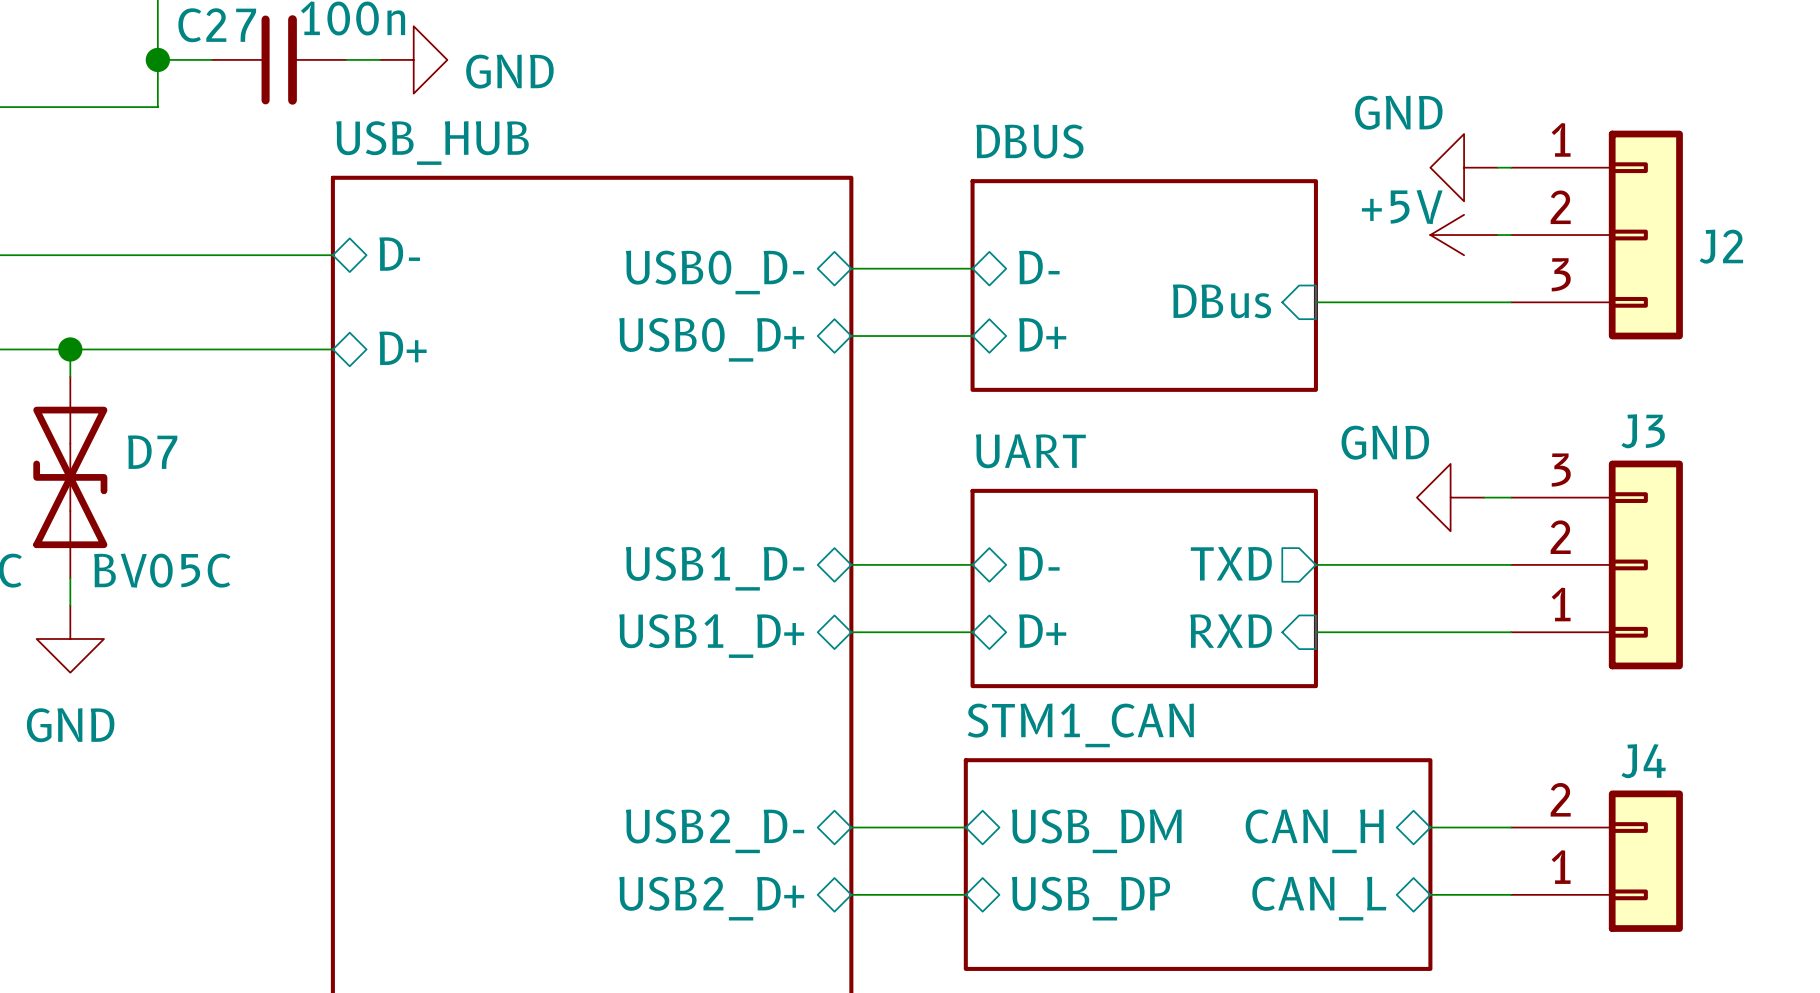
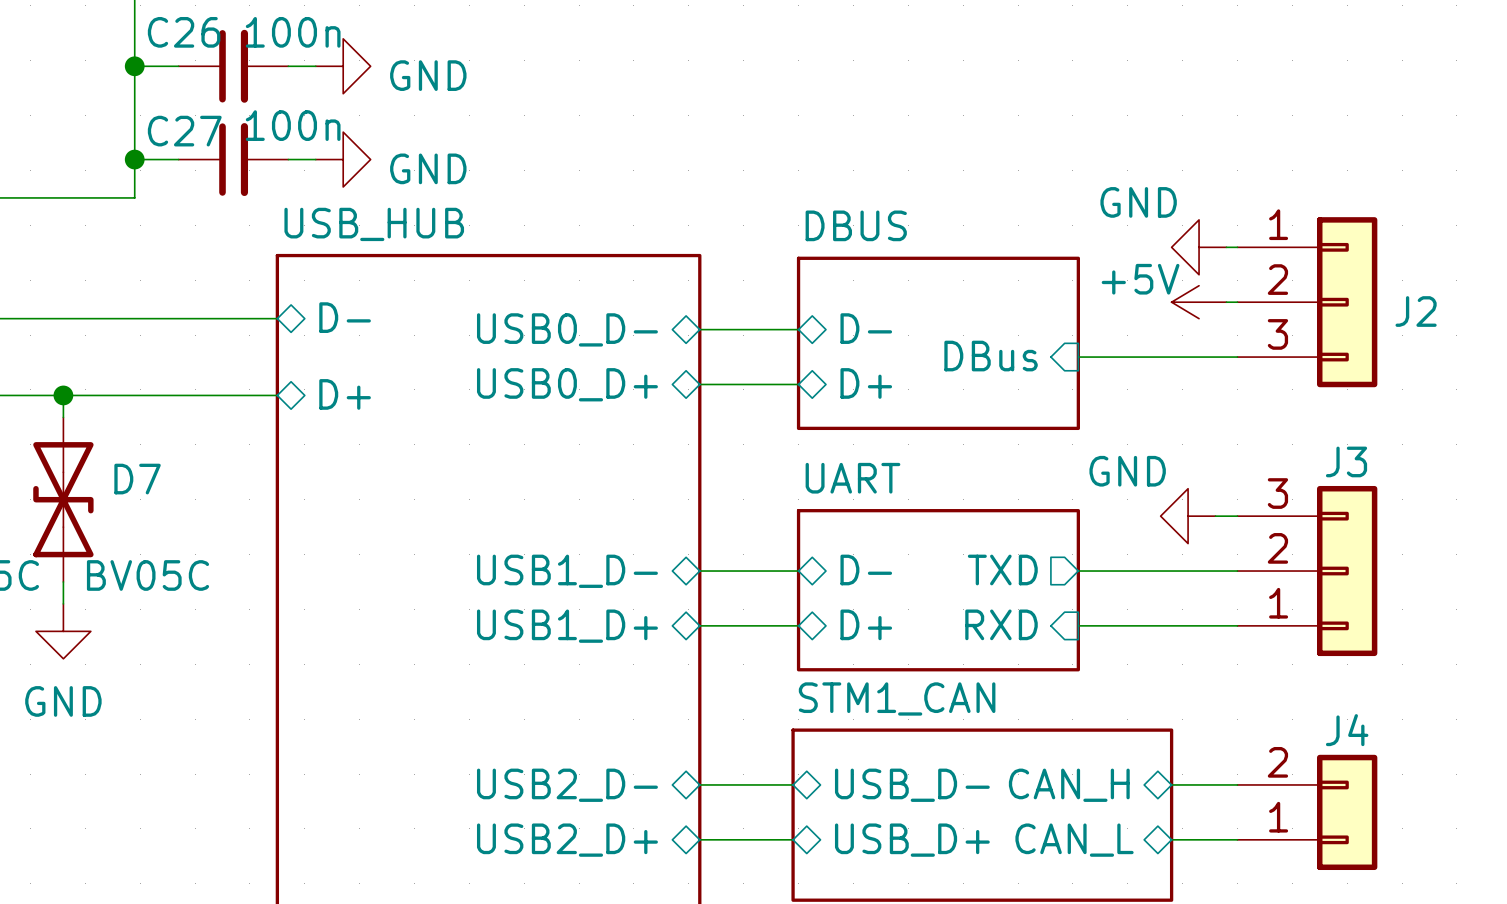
sheet pin: USB_DM (1096, 831) -> USB_D- (912, 785)
sheet pin: USB_DP (1090, 898) -> USB_D+ (912, 840)

